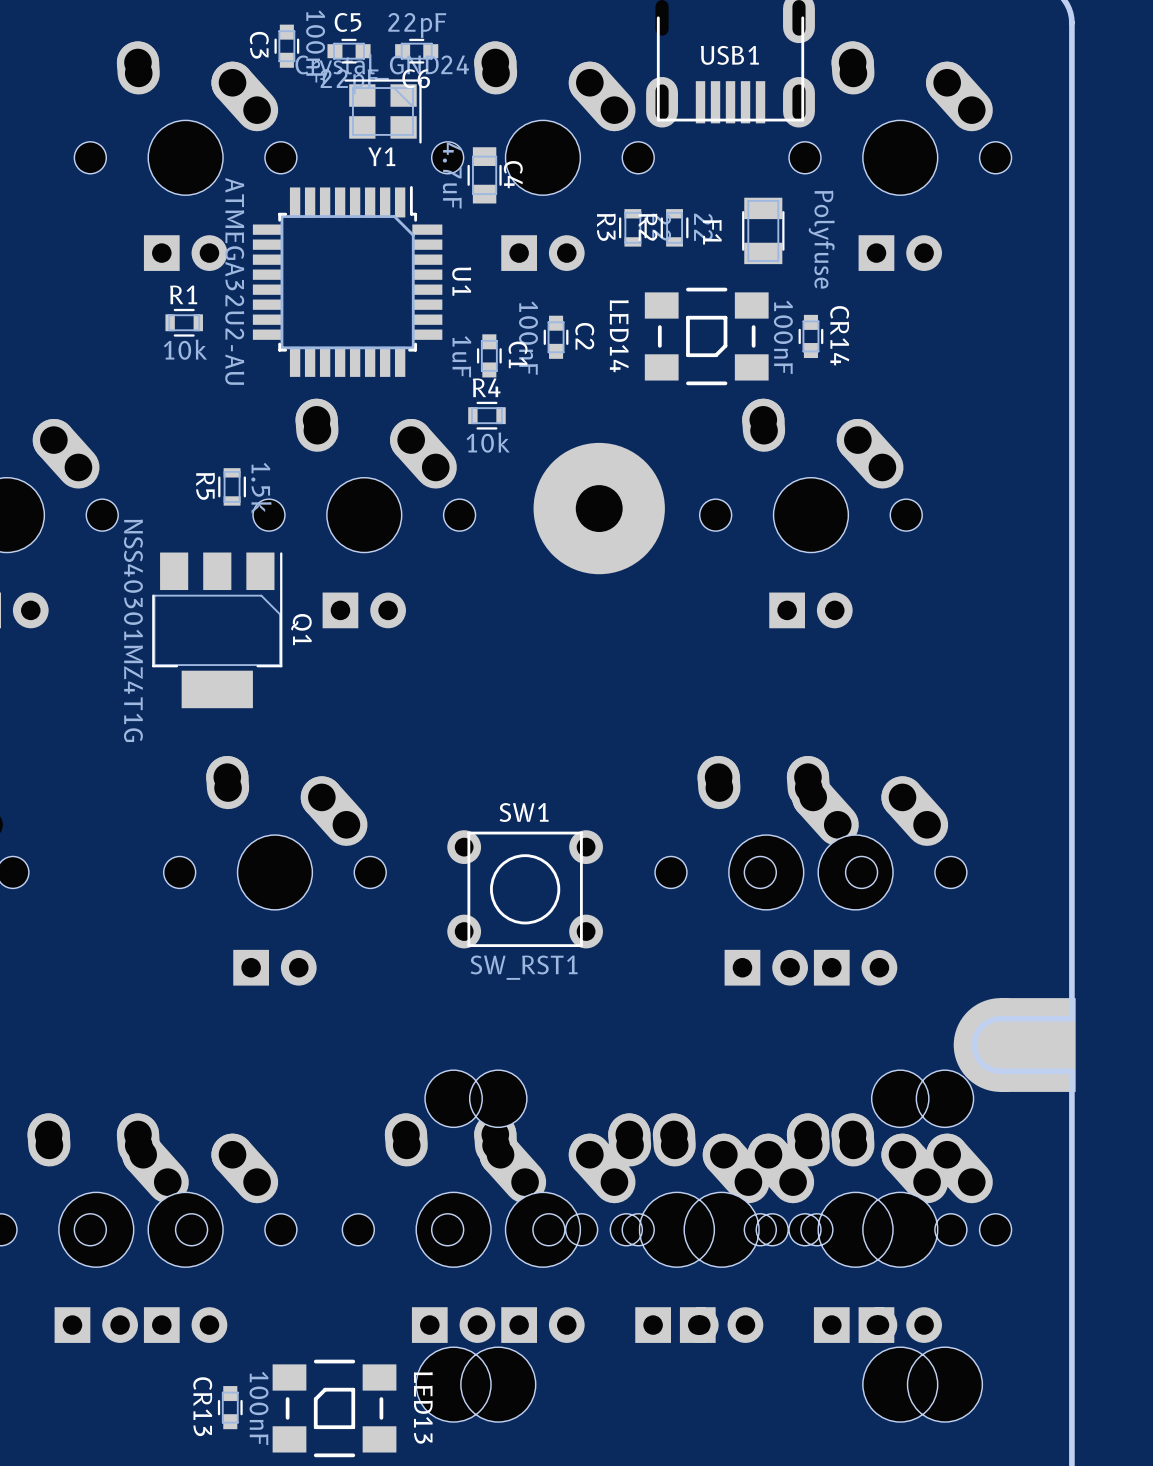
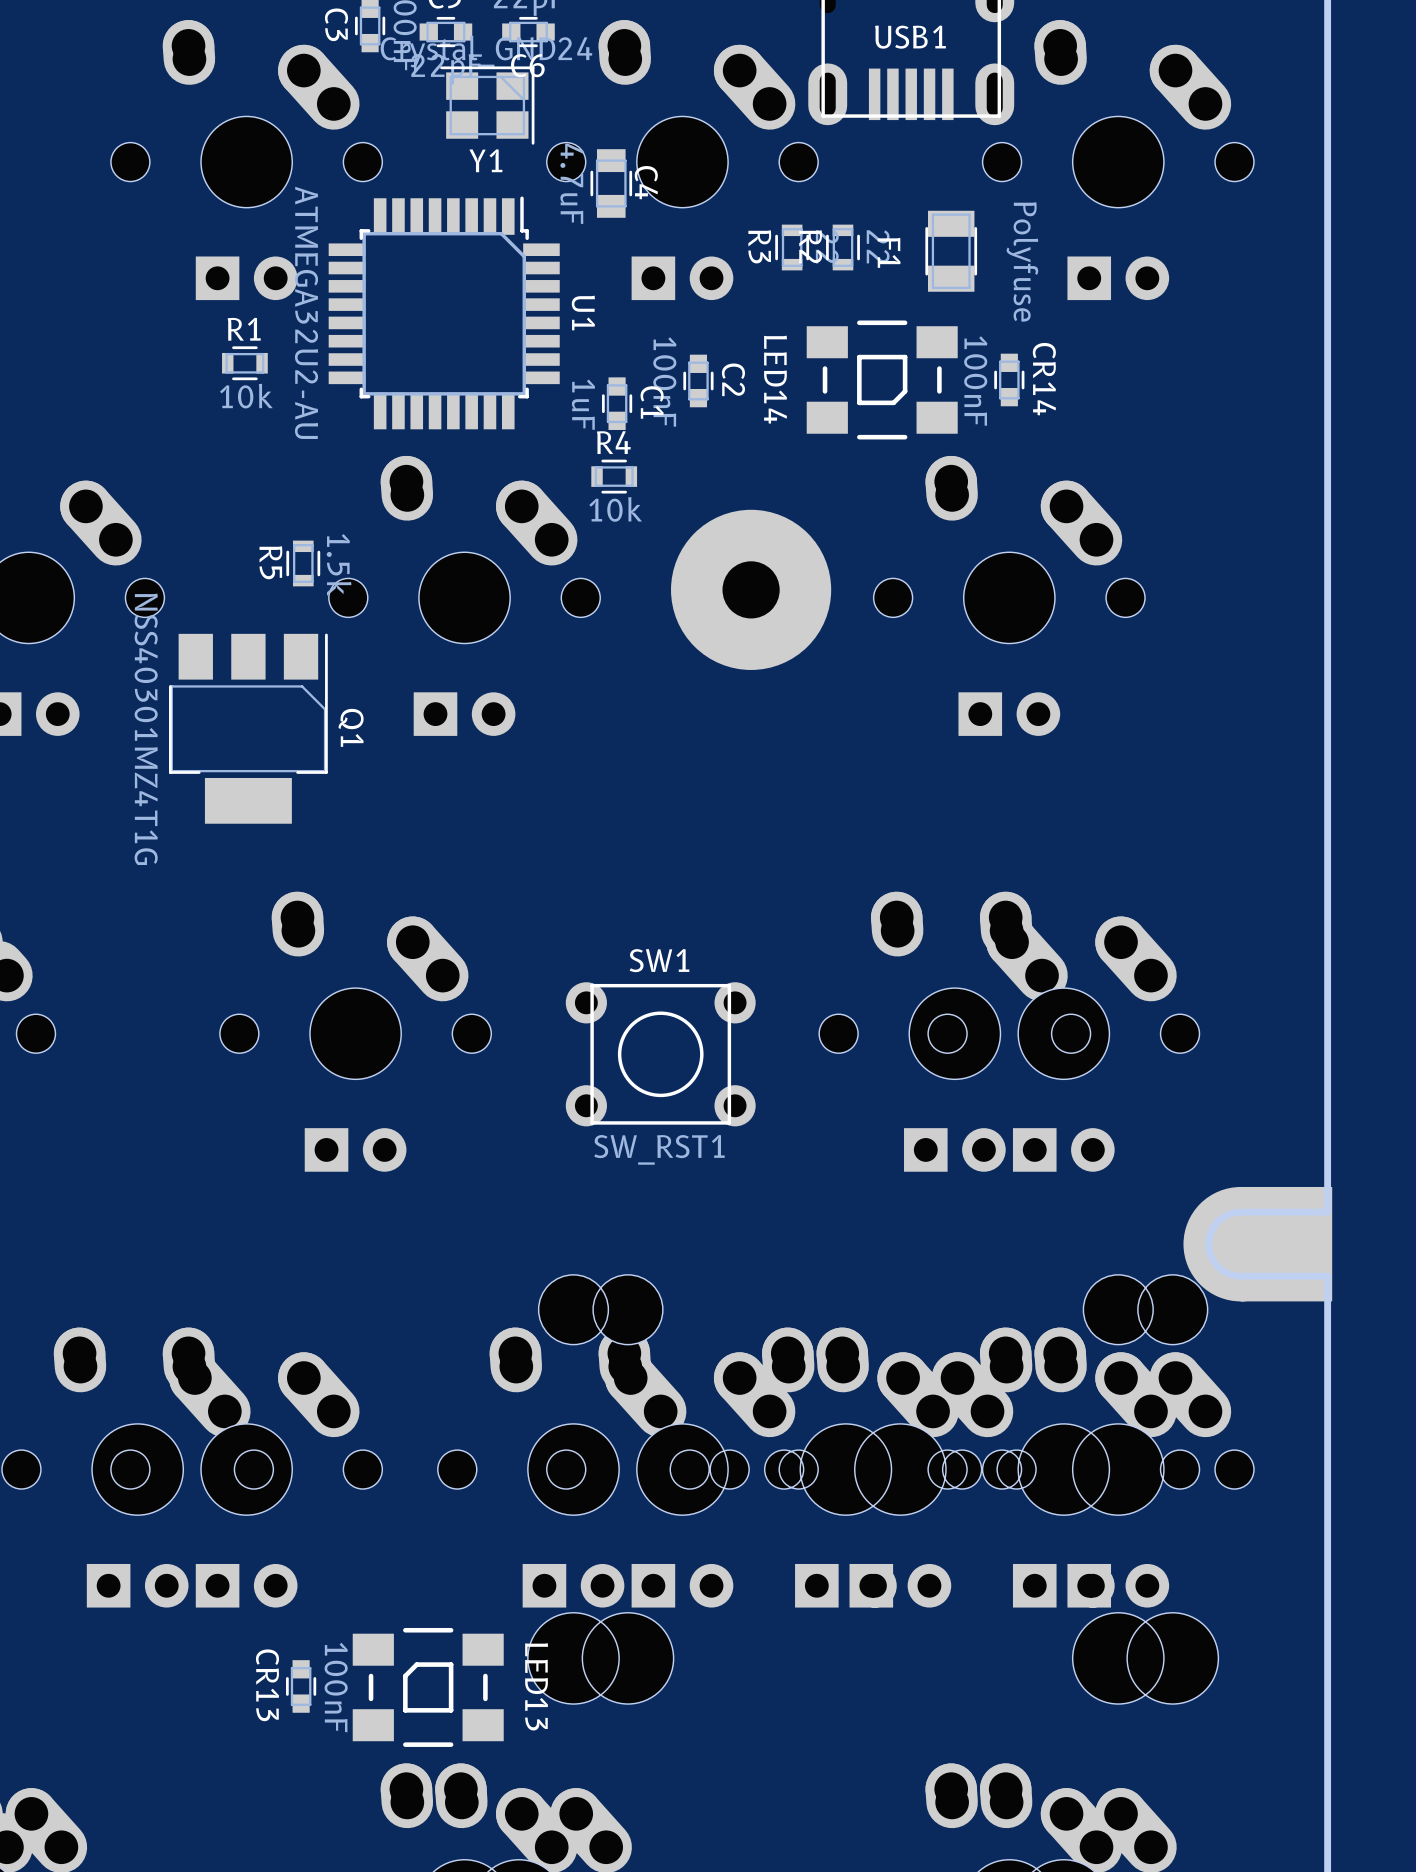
Q1 position: (217, 630) -> (248, 728)

